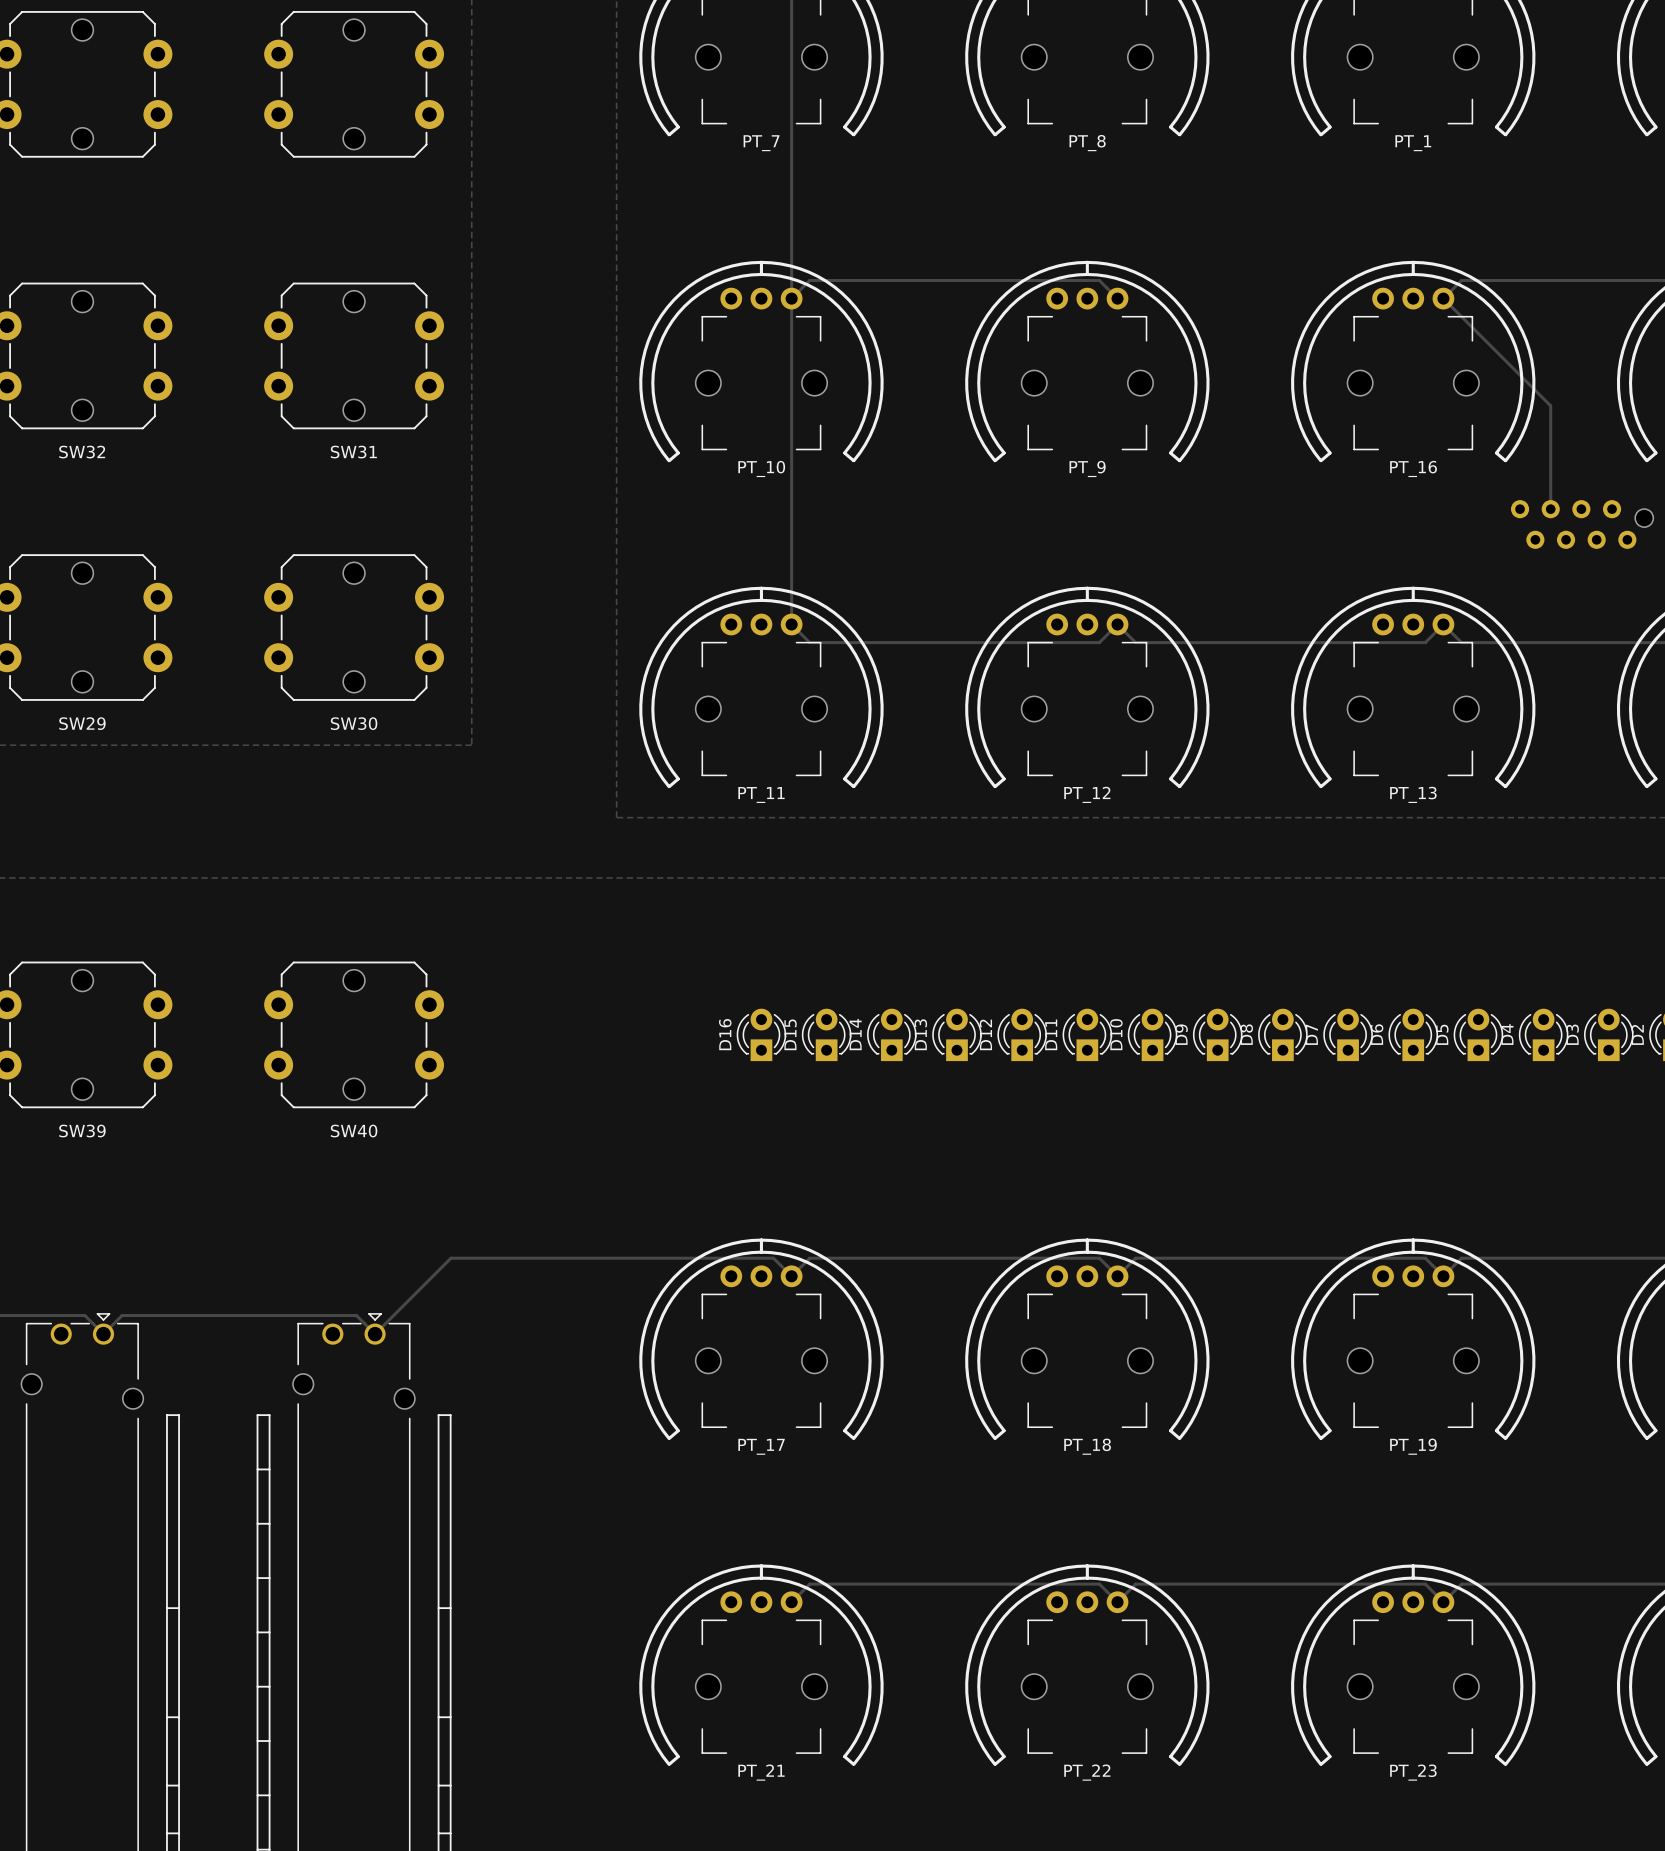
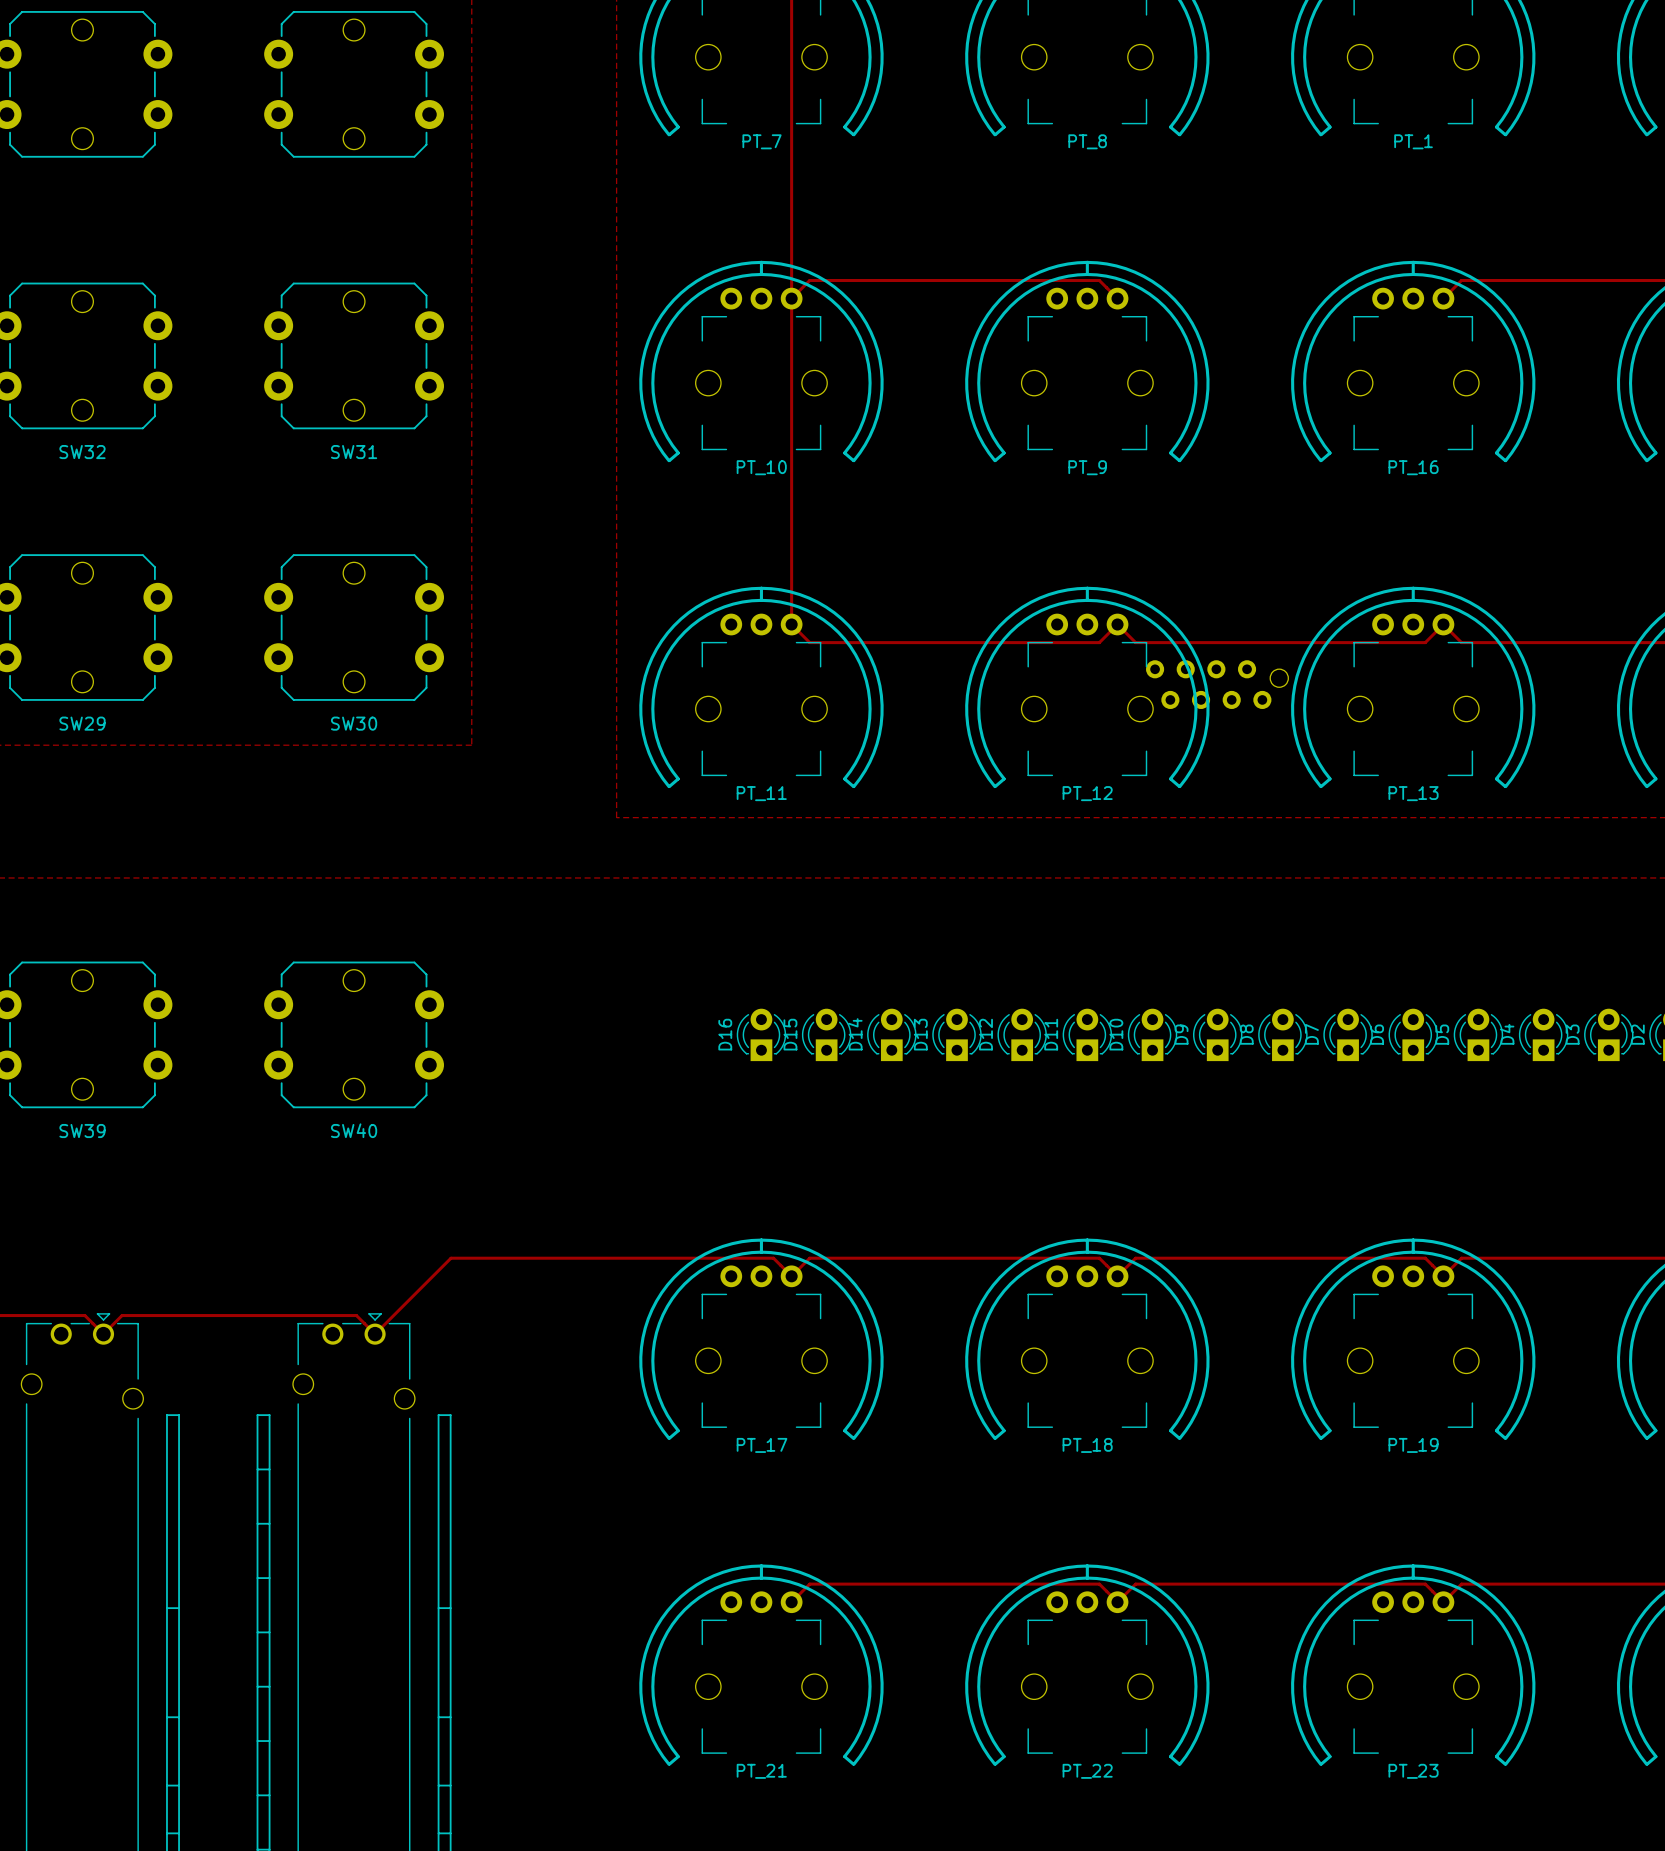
track: (1443, 298) (1550, 405) (1550, 509) -> none
part: (1582, 524) -> none
part: none -> (1217, 684)

